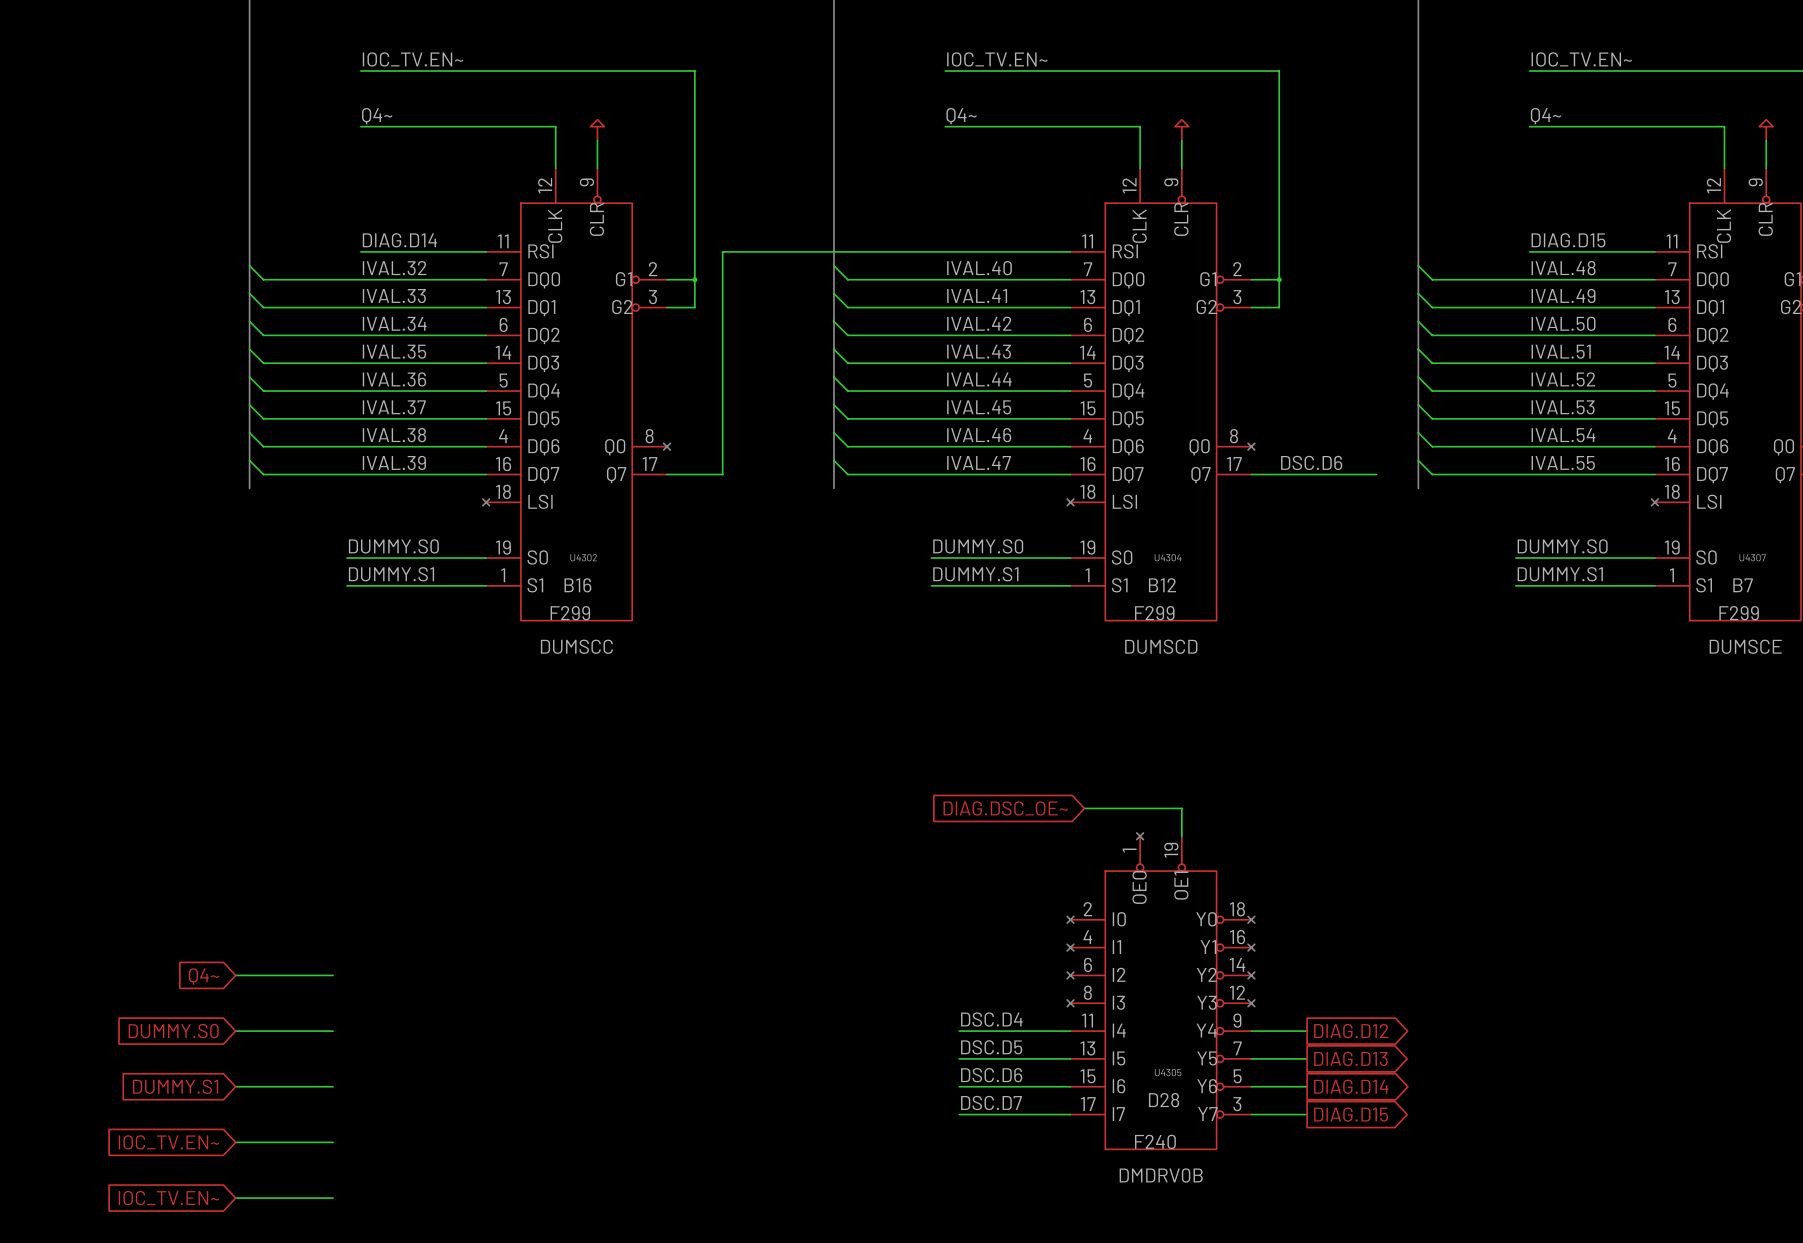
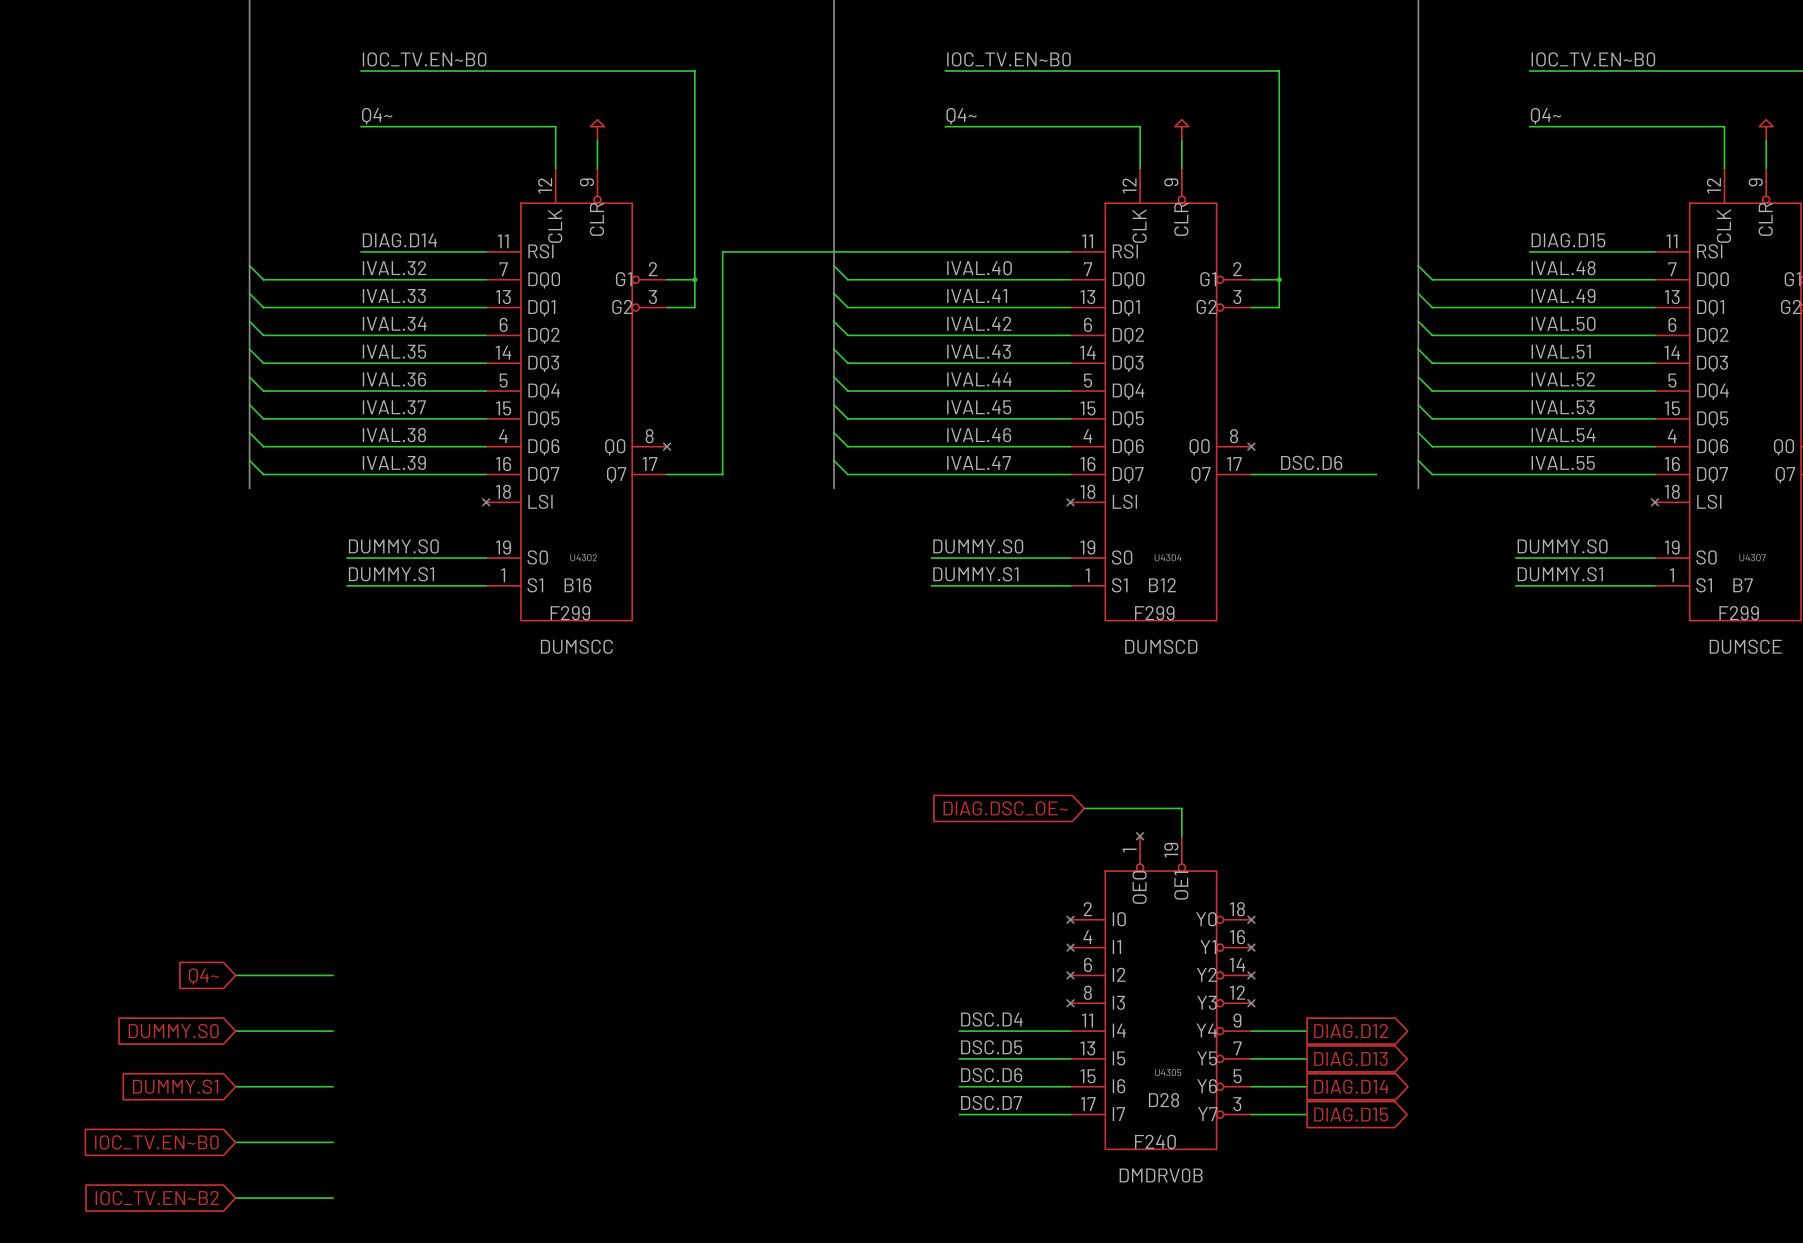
label: IOC_TV.EN~ (413, 59) -> IOC_TV.EN~B0 (424, 59)
label: IOC_TV.EN~ (997, 59) -> IOC_TV.EN~B0 (1008, 59)
label: IOC_TV.EN~ (1581, 59) -> IOC_TV.EN~B0 (1593, 59)
global label: IOC_TV.EN~ (168, 1142) -> IOC_TV.EN~B0 (156, 1142)
global label: IOC_TV.EN~ (168, 1198) -> IOC_TV.EN~B2 (157, 1198)

